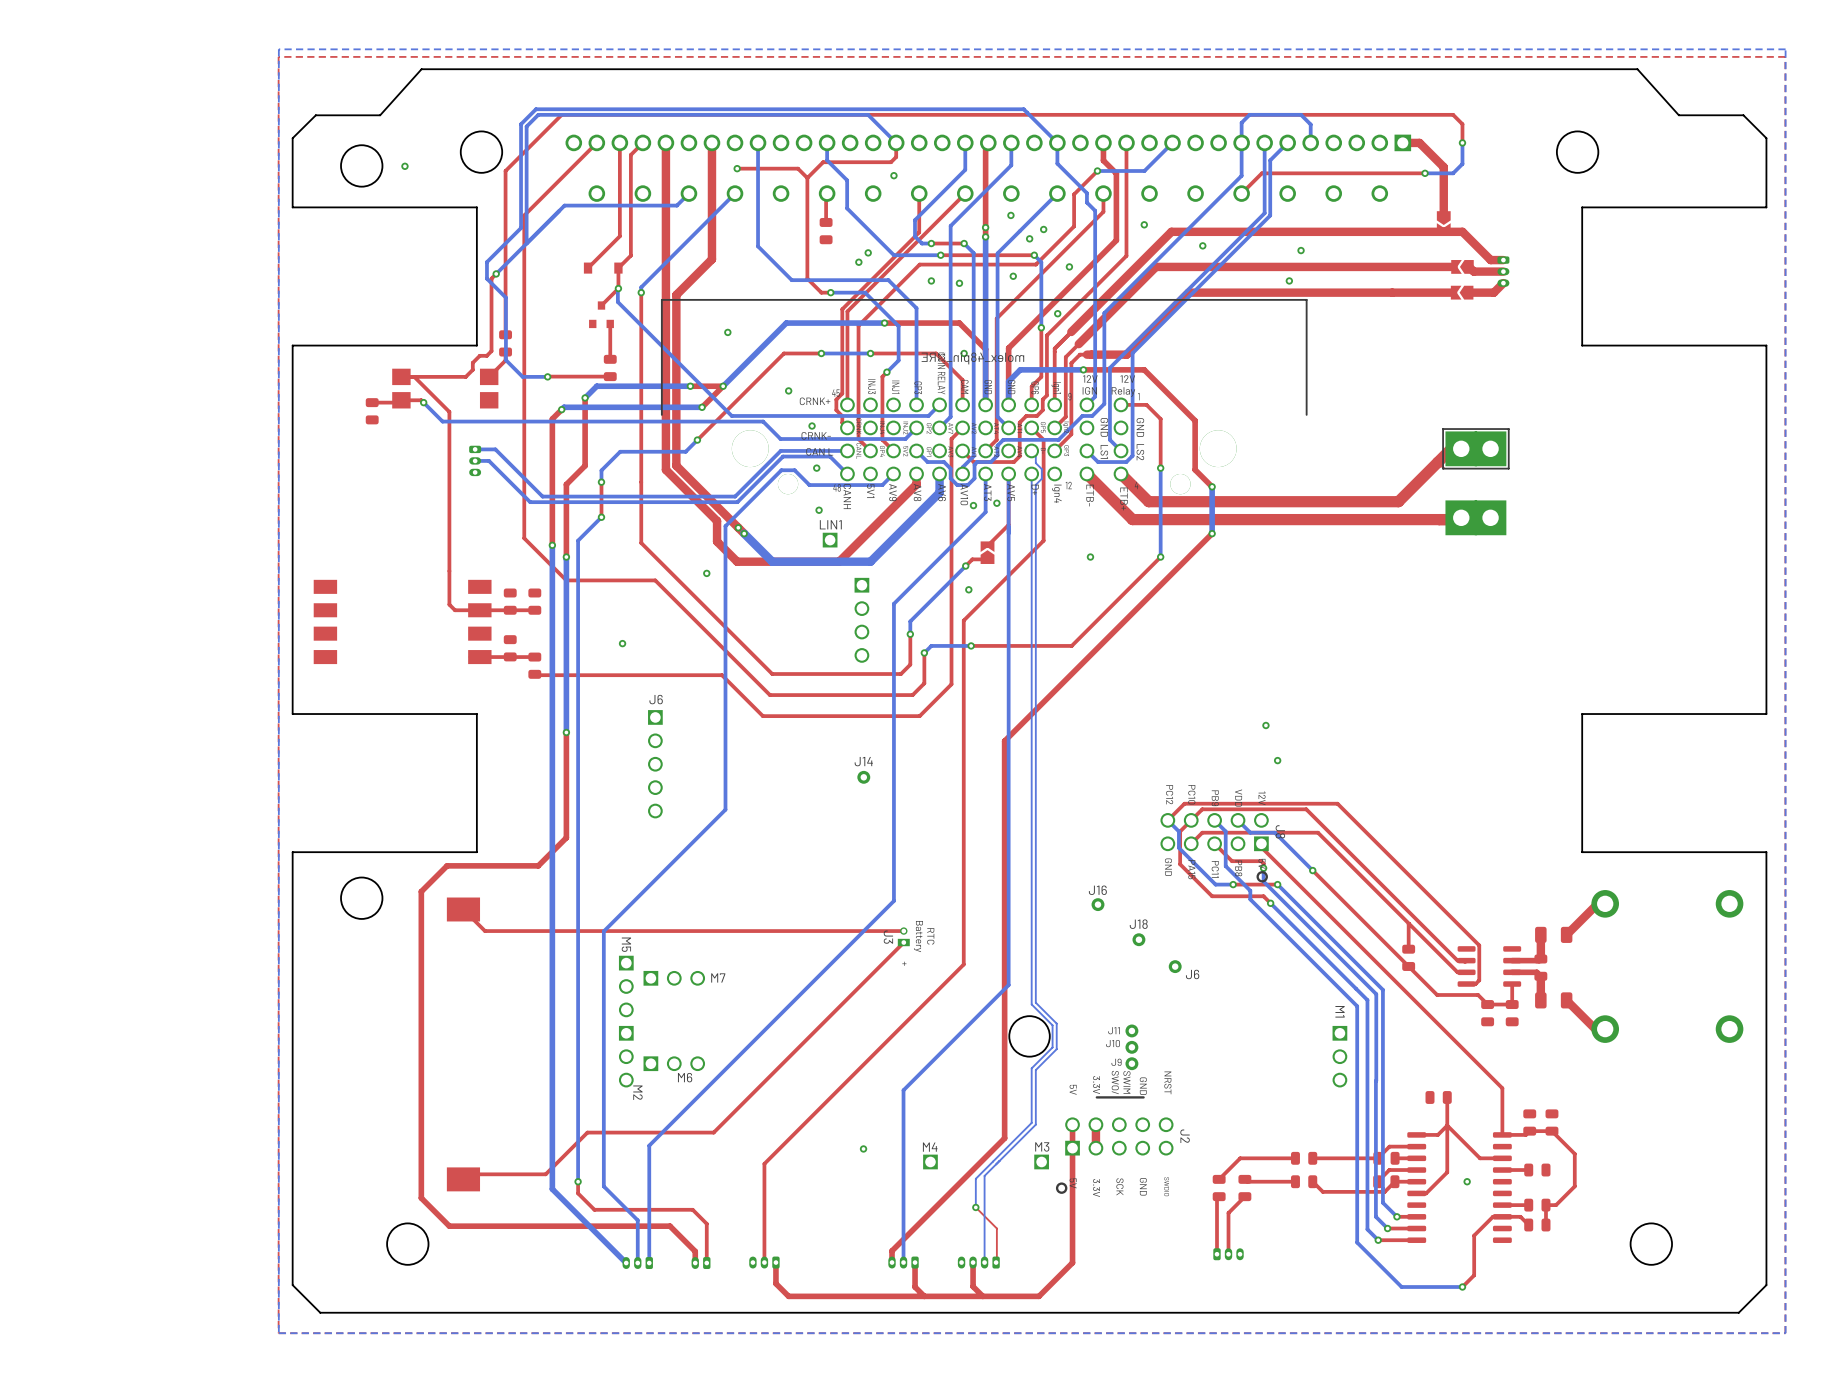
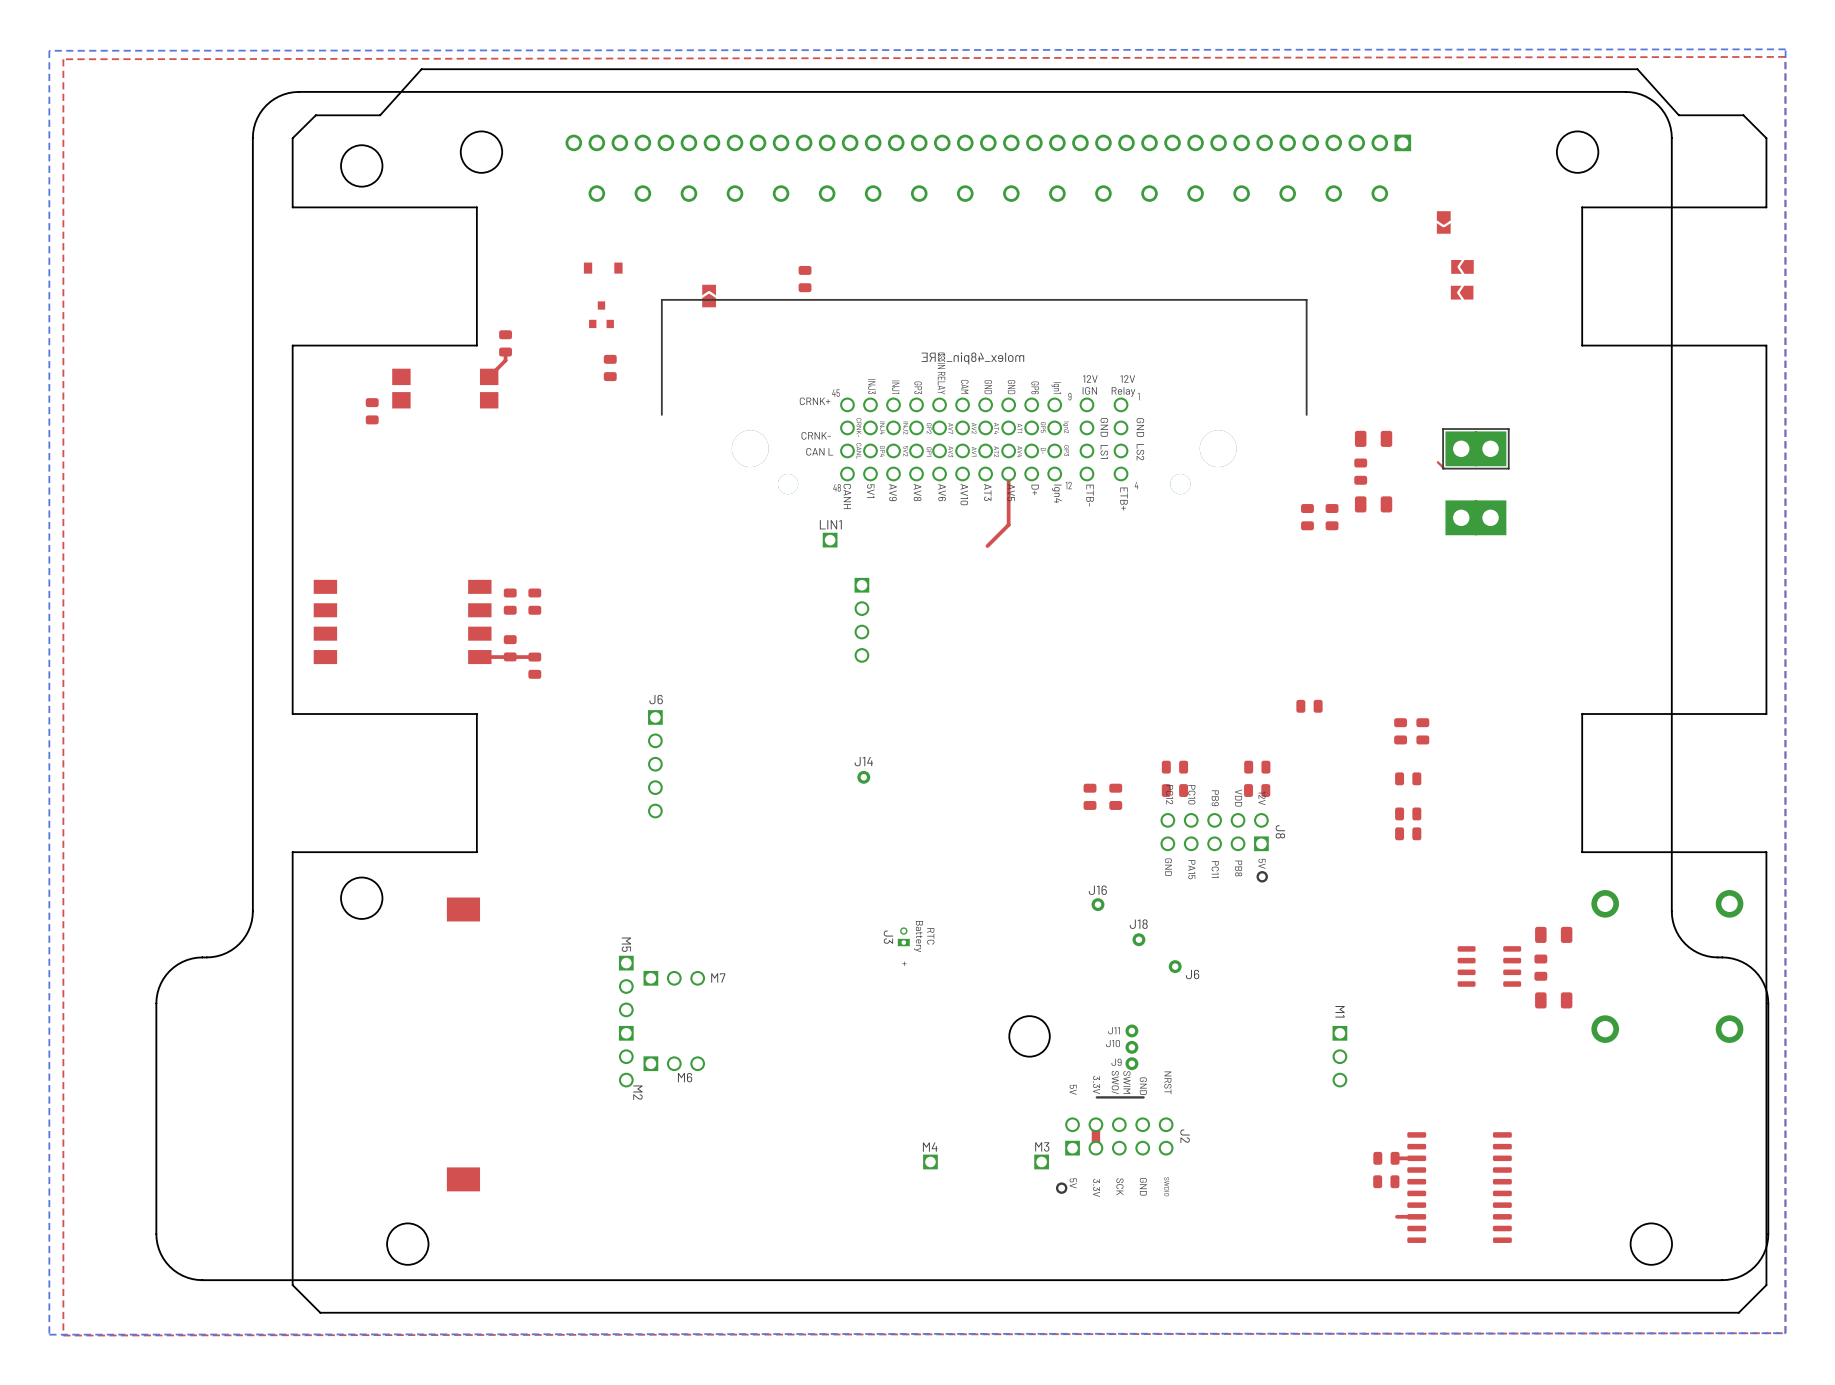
bottom zone outline: (1785, 49) (278, 49) (278, 1333) (1785, 1333) -> (1785, 49) (49, 50) (49, 1334) (1785, 1333)
top zone outline: (1785, 56) (278, 56) (278, 1333) (1785, 1333) -> (1785, 56) (63, 59) (63, 1335) (1785, 1333)
board edge: none -> (1625, 91) (298, 91) (283, 94) (270, 101) (257, 118) (252, 137) (252, 916) (248, 931) (235, 947) (222, 954) (192, 958) (177, 964) (163, 978) (157, 993) (156, 1234) (158, 1249) (166, 1262) (182, 1275) (202, 1280) (1722, 1280) (1737, 1277) (1750, 1270) (1761, 1258) (1768, 1239) (1768, 998) (1761, 978) (1746, 964) (1732, 958) (1702, 954) (1689, 947) (1676, 931) (1672, 916) (1671, 132) (1667, 118) (1658, 105) (1645, 96) (1625, 91)
top track: (596, 142) (524, 215) (524, 538) (566, 580) (655, 580) (769, 695) (912, 695) (924, 683) (924, 652) -> none
top track: (619, 142) (619, 236) (588, 268) -> none
top track: (642, 142) (630, 154) (630, 255) (618, 268) (618, 288) (601, 305) -> none
top track: (665, 142) (665, 469) (717, 521) (717, 541) (737, 561) (839, 561) (916, 484) (916, 473) -> none
top track: (711, 142) (711, 259) (676, 294) (676, 465) (744, 533) -> none
bottom track: (758, 142) (758, 246) (791, 280) (888, 280) (916, 308) (916, 404) -> none
bottom track: (827, 142) (827, 160) (847, 180) (847, 208) (893, 255) (940, 255) -> none
top track: (896, 142) (896, 157) (891, 162) (823, 162) (807, 178) -> none
bottom track: (896, 142) (868, 114) (538, 114) (526, 126) (526, 243) -> none
bottom track: (965, 142) (965, 169) (915, 220) (915, 236) (922, 243) (931, 243) -> none
top track: (988, 142) (985, 145) (985, 236) -> none
bottom track: (1011, 142) (1011, 165) (950, 225) (950, 416) (939, 427) -> none
top track: (1103, 142) (1103, 160) (1116, 173) (1116, 240) (1008, 348) (1008, 404) -> none
top track: (1126, 142) (1126, 255) (1046, 335) (1046, 395) (1042, 399) (1042, 410) (1037, 415) (1026, 415) (1019, 422) (1019, 456) (1013, 462) (973, 462) (962, 450) -> none
bottom track: (1172, 142) (1144, 170) (1097, 170) -> none
bottom track: (1264, 142) (1264, 213) (1109, 367) (1109, 439) (1121, 450) -> none
bottom track: (1287, 142) (1270, 160) (1270, 215) (1132, 353) (1132, 455) (1126, 462) (1098, 462) (1086, 450) -> none
bottom track: (1310, 142) (1310, 124) (1301, 114) (1249, 114) (1241, 122) (1241, 175) (1104, 313) (1104, 403) (1092, 415) (1082, 415) (1058, 439) (1003, 439) (997, 445) (997, 455) (990, 462) (977, 462) (974, 464) (974, 478) (967, 485) (957, 485) (950, 478) (950, 468) (944, 462) (927, 462) (916, 450) -> none
top track: (1409, 142) (1402, 142) (1419, 142) (1443, 167) (1443, 215) -> none
top track: (1462, 142) (1462, 124) (1453, 114) (561, 114) (505, 170) (505, 334) -> none
bottom track: (1462, 142) (1462, 163) (1453, 173) (1425, 173) -> none
via: (1462, 142) -> none
via: (404, 166) -> none
top track: (737, 168) (798, 168) (807, 178) -> none
via: (737, 168) -> none
top track: (1097, 170) (1074, 194) (1074, 226) (1035, 264) (919, 264) (858, 325) (858, 439) (870, 450) -> none
via: (1097, 170) -> none
top track: (1425, 173) (1261, 173) (1241, 193) -> none
via: (1425, 173) -> none
via: (893, 175) -> none
top track: (807, 178) (807, 278) (821, 292) (830, 292) -> none
bottom track: (688, 193) (676, 205) (564, 205) (496, 273) -> none
bottom track: (735, 193) (641, 287) (641, 292) -> none
top track: (827, 193) (826, 222) -> none
top track: (919, 193) (919, 232) (842, 309) (842, 393) (836, 399) (836, 410) (842, 416) (842, 422) (847, 427) -> none
top track: (965, 193) (847, 311) (847, 404) -> none
bottom track: (1057, 193) (997, 253) (997, 416) (1008, 427) -> none
top track: (1103, 193) (1103, 211) (996, 318) (996, 439) (985, 450) -> none
via: (1010, 215) -> none
via: (1144, 224) -> none
via: (985, 227) -> none
via: (1043, 229) -> none
part position: (826, 231) -> (805, 279)
bottom track: (985, 236) (985, 404) -> none
via: (985, 236) -> none
via: (1029, 238) -> none
via: (931, 243) -> none
top track: (964, 243) (931, 243) -> none
bottom track: (964, 243) (973, 253) (973, 456) (962, 467) (962, 473) -> none
via: (964, 243) -> none
via: (1202, 245) -> none
via: (1301, 250) -> none
via: (868, 252) -> none
via: (940, 255) -> none
top track: (1034, 255) (940, 255) -> none
bottom track: (1034, 255) (1041, 262) (1041, 327) -> none
via: (1034, 255) -> none
top track: (1503, 260) (1490, 260) (1462, 231) (1171, 231) (1071, 331) -> none
via: (858, 262) -> none
via: (1069, 266) -> none
top track: (1455, 266) (1155, 266) (1065, 357) (1065, 416) (1054, 427) -> none
top track: (1469, 266) (1473, 271) (1503, 271) -> none
part: (1503, 271) -> none
top track: (496, 273) (491, 278) (491, 351) (486, 355) (479, 355) (472, 362) (472, 369) (465, 376) (401, 376) -> none
via: (496, 273) -> none
via: (1013, 276) -> none
via: (931, 280) -> none
via: (1289, 280) -> none
via: (959, 283) -> none
top track: (1503, 283) (1493, 292) (1468, 292) -> none
bottom track: (618, 288) (617, 302) (731, 415) (928, 415) (939, 404) -> none
via: (618, 288) -> none
top track: (641, 292) (641, 542) (772, 674) (900, 674) (910, 664) (910, 634) -> none
via: (641, 292) -> none
bottom track: (830, 292) (865, 292) (898, 326) (898, 360) (886, 372) -> none
via: (830, 292) -> none
top track: (1455, 292) (1188, 292) (1126, 354) (1086, 354) -> none
part: none -> (709, 296)
via: (1057, 313) -> none
top track: (1082, 320) (1054, 348) (1054, 404) -> none
top track: (610, 323) (610, 359) -> none
top track: (884, 323) (959, 323) (985, 349) (985, 404) -> none
bottom track: (884, 323) (786, 323) (723, 386) -> none
via: (884, 323) -> none
top track: (1041, 327) (1041, 376) (1031, 386) (1031, 404) -> none
via: (1041, 327) -> none
via: (727, 332) -> none
top track: (821, 353) (783, 353) (697, 440) -> none
via: (821, 353) -> none
top track: (870, 353) (936, 353) (962, 380) (962, 404) -> none
bottom track: (870, 353) (821, 353) -> none
via: (870, 353) -> none
via: (964, 353) -> none
top track: (1091, 354) (1079, 354) (1071, 363) (1071, 434) (1054, 450) -> none
top track: (1083, 369) (1144, 369) (1195, 420) (1195, 469) (1212, 486) -> none
bottom track: (1083, 369) (1020, 369) (1008, 381) (1008, 404) -> none
via: (1083, 369) -> none
top track: (886, 372) (882, 376) (882, 439) (893, 450) -> none
via: (886, 372) -> none
top track: (414, 376) (449, 411) (449, 604) (455, 610) (534, 610) -> none
bottom track: (547, 376) (522, 376) (505, 360) (505, 297) (486, 278) (486, 262) (521, 228) (521, 124) (536, 109) (1023, 109) (1057, 142) (1057, 163) (1086, 193) (1086, 202) (1095, 210) (1095, 396) (1086, 404) -> none
via: (547, 376) -> none
top track: (610, 376) (547, 376) -> none
top track: (690, 386) (723, 386) (702, 407) -> none
bottom track: (690, 386) (596, 386) (585, 397) -> none
via: (690, 386) -> none
via: (723, 386) -> none
via: (788, 390) -> none
top track: (585, 397) (585, 465) (566, 484) (566, 557) -> none
via: (585, 397) -> none
top track: (372, 402) (399, 402) (401, 400) (421, 400) (423, 402) -> none
bottom track: (423, 402) (442, 421) (763, 421) (780, 439) (905, 439) (916, 427) -> none
via: (423, 402) -> none
top track: (1121, 404) (1146, 404) (1160, 418) (1160, 468) -> none
bottom track: (702, 407) (564, 407) (561, 409) -> none
via: (702, 407) -> none
top track: (561, 409) (552, 418) (552, 545) -> none
via: (561, 409) -> none
via: (812, 426) -> none
top track: (962, 427) (951, 439) (951, 684) (919, 716) (762, 716) (721, 675) (534, 674) -> none
top track: (1031, 427) (1043, 439) (1043, 540) (963, 620) (963, 964) (764, 1163) (764, 1262) -> none
part: none -> (1373, 438)
bottom track: (697, 440) (685, 451) (620, 451) (601, 470) (601, 482) -> none
via: (697, 440) -> none
top track: (1490, 448) (1451, 448) (1398, 501) (1148, 501) (1121, 473) -> none
bottom track: (475, 449) (495, 449) (542, 496) (735, 496) (780, 450) (847, 450) -> none
bottom track: (1031, 450) (1035, 455) (1035, 463) (1041, 469) (1041, 478) (1035, 484) (1035, 1002) (1056, 1023) (1056, 1049) (1035, 1070) (1035, 1124) (984, 1175) (984, 1262) -> none
bottom track: (475, 460) (489, 460) (530, 502) (737, 502) (783, 456) (830, 456) (847, 473) -> none
part: (475, 460) -> none
via: (816, 468) -> none
bottom track: (1160, 468) (1160, 557) -> none
via: (1160, 468) -> none
part: none -> (1360, 471)
bottom track: (893, 473) (882, 485) (809, 485) (794, 470) (781, 470) (725, 526) (725, 809) (603, 931) (603, 1186) (637, 1220) (637, 1263) -> none
bottom track: (939, 473) (939, 492) (870, 561) (772, 561) (744, 533) -> none
bottom track: (985, 473) (985, 512) (893, 603) (893, 900) (649, 1145) (649, 1263) -> none
bottom track: (1008, 473) (1008, 985) (903, 1090) (903, 1262) -> none
bottom track: (1031, 473) (1031, 1004) (1052, 1025) (1052, 1047) (1031, 1068) (1031, 1122) (975, 1178) (975, 1207) -> none
top track: (1086, 473) (1132, 519) (1459, 519) (1461, 517) -> none
top track: (601, 482) (601, 517) -> none
via: (601, 482) -> none
bottom track: (1212, 486) (1212, 533) -> none
via: (1212, 486) -> none
via: (996, 503) -> none
part: none -> (1373, 504)
via: (973, 505) -> none
via: (819, 510) -> none
bottom track: (601, 517) (578, 540) (578, 1181) -> none
via: (601, 517) -> none
part: none -> (1307, 517)
part: none -> (1332, 517)
via: (738, 527) -> none
via: (744, 533) -> none
top track: (1212, 533) (1004, 741) (1004, 1138) (892, 1250) (892, 1262) -> none
via: (1212, 533) -> none
bottom track: (552, 545) (552, 1189) (626, 1263) -> none
via: (552, 545) -> none
part: (987, 552) -> none
bottom track: (566, 557) (566, 732) -> none
via: (566, 557) -> none
via: (1090, 557) -> none
top track: (1160, 557) (1071, 645) (971, 645) -> none
via: (1160, 557) -> none
top track: (987, 559) (972, 559) (965, 566) -> none
bottom track: (965, 566) (910, 621) (910, 634) -> none
via: (965, 566) -> none
via: (706, 573) -> none
via: (968, 589) -> none
via: (910, 634) -> none
via: (622, 643) -> none
bottom track: (971, 645) (931, 645) (924, 652) -> none
via: (971, 645) -> none
via: (924, 652) -> none
part: none -> (1309, 706)
via: (1265, 725) -> none
part: none -> (1400, 731)
part: none -> (1422, 731)
top track: (566, 732) (566, 837) (538, 865) (447, 865) (421, 891) (421, 1198) (449, 1226) (670, 1226) (695, 1251) (695, 1263) -> none
via: (566, 732) -> none
via: (1277, 760) -> none
part: none -> (1174, 767)
part: none -> (1257, 767)
part: none -> (1408, 778)
part: none -> (1174, 790)
part: none -> (1257, 790)
part: none -> (1090, 796)
part: none -> (1115, 796)
part: none -> (1408, 813)
top track: (1167, 820) (1184, 803) (1337, 803) (1479, 945) (1479, 980) (1475, 984) (1466, 984) -> none
bottom track: (1167, 820) (1178, 831) (1178, 847) (1215, 884) (1233, 884) -> none
bottom track: (1214, 820) (1225, 831) (1225, 866) (1250, 890) (1250, 899) (1357, 1006) (1357, 1242) (1401, 1287) (1462, 1287) -> none
bottom track: (1238, 820) (1250, 832) (1274, 832) (1312, 870) -> none
part: none -> (1408, 833)
top track: (1191, 843) (1202, 832) (1317, 832) (1457, 972) (1466, 972) -> none
top track: (1214, 843) (1232, 861) (1261, 861) (1263, 868) -> none
top track: (1261, 843) (1261, 847) (1502, 1088) (1502, 1134) (1525, 1134) (1529, 1131) (1551, 1131) (1574, 1153) (1574, 1186) (1556, 1205) (1545, 1205) (1545, 1225) -> none
bottom track: (1263, 868) (1263, 881) (1376, 994) (1375, 1216) (1387, 1228) -> none
via: (1263, 868) -> none
top track: (1312, 870) (1437, 994) (1478, 994) (1487, 1004) (1512, 1004) (1512, 984) -> none
via: (1312, 870) -> none
via: (1233, 884) -> none
top track: (1277, 884) (1233, 884) -> none
bottom track: (1277, 884) (1382, 989) (1382, 1202) (1396, 1216) -> none
via: (1277, 884) -> none
top track: (1270, 903) (1263, 896) (1212, 896) (1180, 864) (1180, 831) (1202, 809) (1306, 809) (1457, 960) (1466, 960) (1465, 962) -> none
bottom track: (1270, 903) (1367, 1000) (1367, 1229) (1378, 1240) -> none
via: (1270, 903) -> none
top track: (1597, 903) (1566, 934) -> none
top track: (463, 909) (485, 931) (903, 931) -> none
top track: (1409, 923) (1408, 949) -> none
top track: (1540, 934) (1540, 959) (1539, 960) (1512, 960) -> none
top track: (903, 942) (713, 1132) (587, 1132) (545, 1174) (468, 1174) (463, 1179) -> none
part: (1408, 957) -> none
top track: (1512, 972) (1536, 972) (1540, 976) (1540, 1000) -> none
top track: (1566, 1000) (1595, 1029) -> none
part: (1487, 1013) -> none
part: (1512, 1013) -> none
part: (1438, 1097) -> none
top track: (1447, 1097) (1447, 1172) (1426, 1193) (1416, 1193) -> none
part: (1529, 1122) -> none
part: (1551, 1122) -> none
top track: (1072, 1124) (1072, 1262) (1039, 1296) (788, 1296) (775, 1283) (775, 1262) -> none
top track: (1416, 1134) (1437, 1134) (1447, 1125) (1480, 1158) (1502, 1158) -> none
top track: (1416, 1146) (1389, 1146) (1377, 1158) (1312, 1158) -> none
via: (863, 1148) -> none
top track: (1295, 1158) (1240, 1158) (1219, 1179) -> none
part: (1304, 1158) -> none
top track: (1416, 1170) (1389, 1170) (1377, 1181) -> none
top track: (1528, 1170) (1502, 1170) -> none
part: (1537, 1170) -> none
top track: (1244, 1179) (1247, 1181) (1295, 1181) -> none
top track: (578, 1181) (578, 1193) (594, 1209) (692, 1209) (706, 1223) (706, 1263) -> none
via: (578, 1181) -> none
part: (1304, 1181) -> none
top track: (1416, 1181) (1394, 1181) (1384, 1191) (1322, 1191) (1312, 1181) -> none
via: (1467, 1181) -> none
part: (1219, 1188) -> none
part: (1244, 1188) -> none
top track: (1219, 1196) (1217, 1198) (1217, 1254) -> none
top track: (1244, 1196) (1228, 1213) (1228, 1254) -> none
top track: (1528, 1205) (1502, 1205) -> none
part: (1537, 1205) -> none
top track: (975, 1207) (996, 1228) (996, 1262) -> none
via: (975, 1207) -> none
via: (1396, 1216) -> none
top track: (1528, 1225) (1520, 1216) (1492, 1216) (1474, 1235) (1474, 1275) (1462, 1287) -> none
part: (1537, 1225) -> none
via: (1387, 1228) -> none
top track: (1416, 1228) (1387, 1228) -> none
via: (1378, 1240) -> none
top track: (1419, 1240) (1378, 1240) -> none
part: (1228, 1254) -> none
part: (764, 1262) -> none
part: (903, 1262) -> none
top track: (915, 1262) (915, 1287) (924, 1296) -> none
top track: (973, 1262) (973, 1286) (982, 1296) -> none
part: (978, 1262) -> none
part: (637, 1263) -> none
part: (701, 1263) -> none
via: (1462, 1287) -> none

